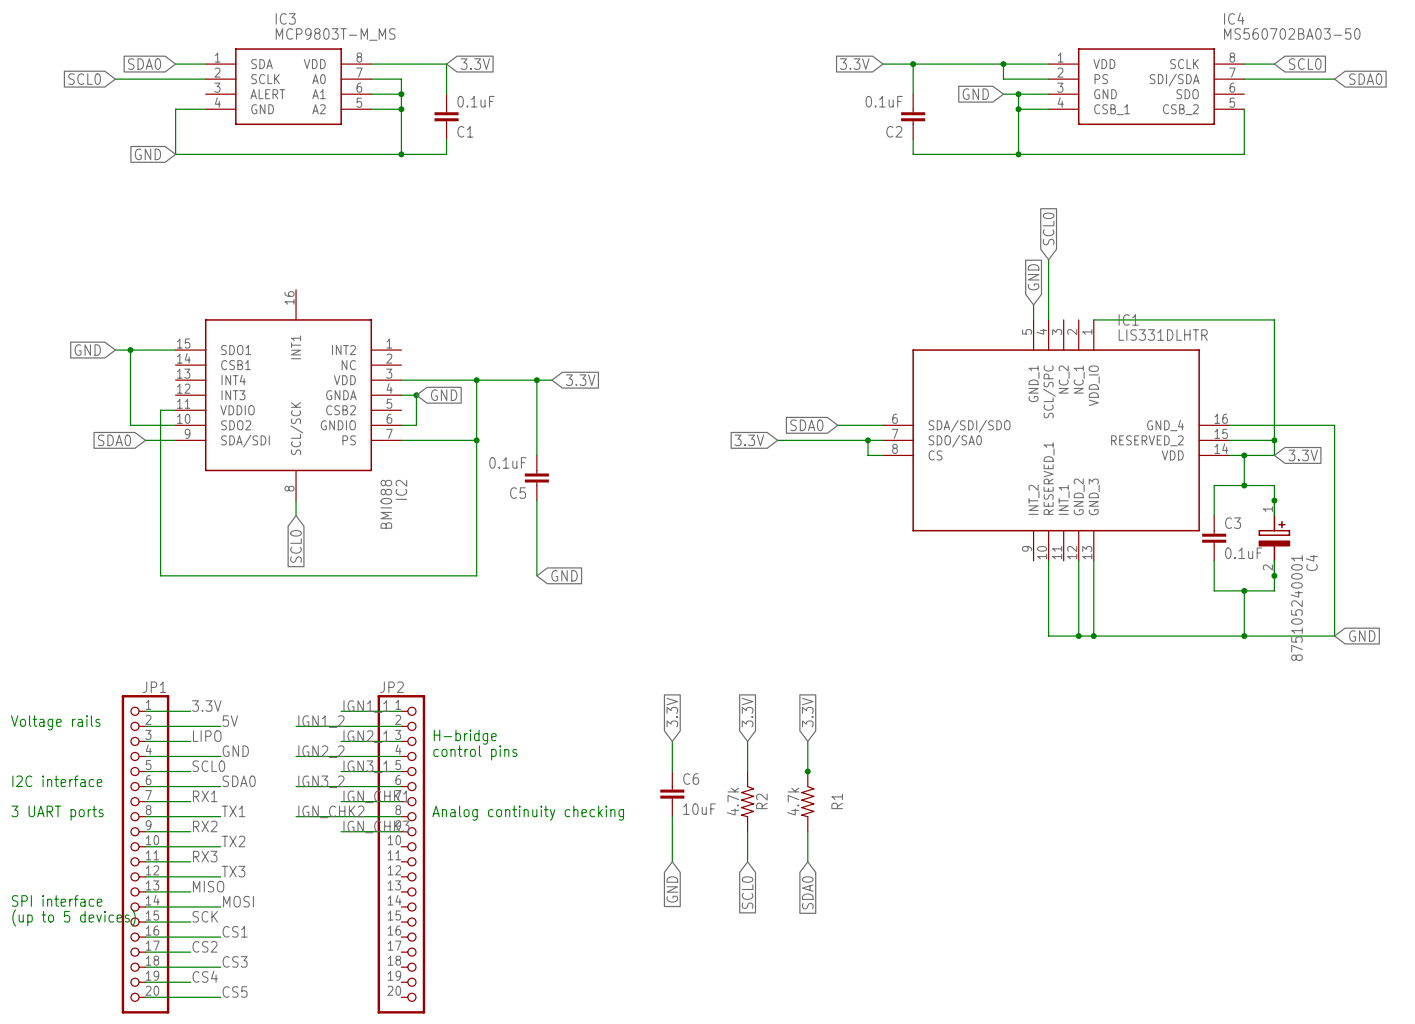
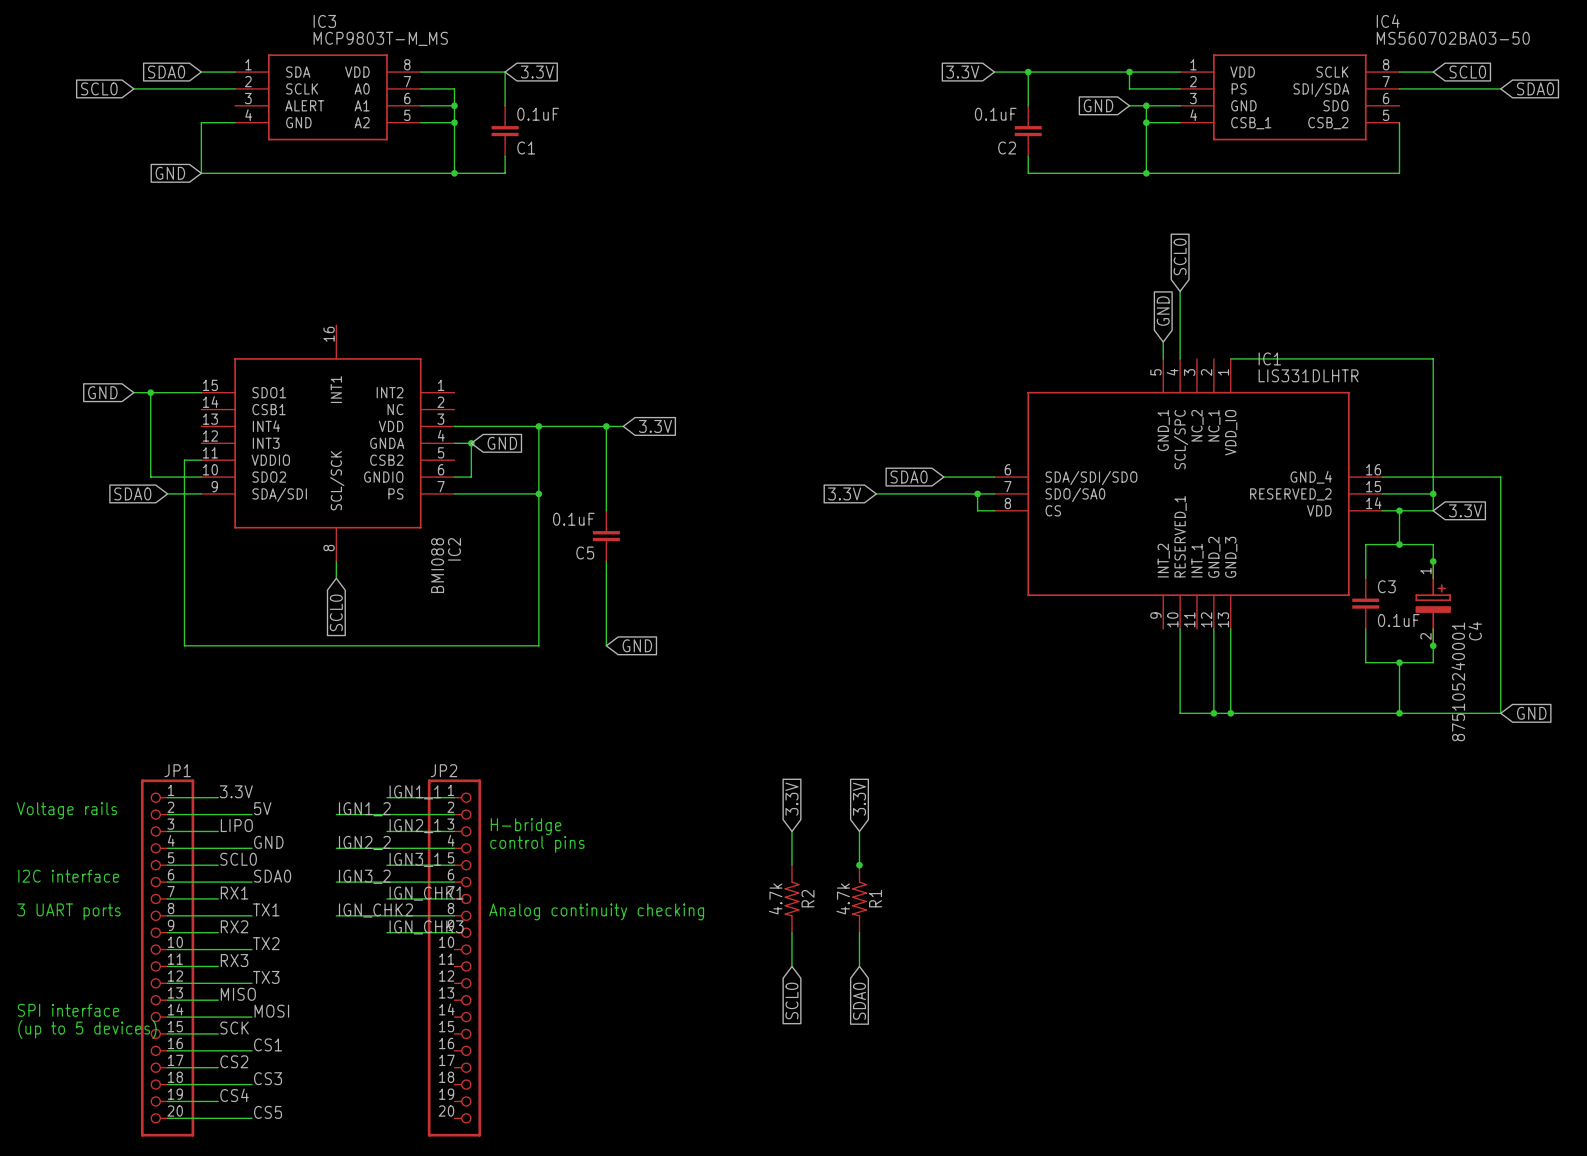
global label: 3.3V (672, 712) -> none
global label: none -> 3.3V (791, 799)
global label position: 3.3V (747, 712) -> 3.3V (859, 799)
global label: 3.3V (807, 712) -> none
wire: (672, 741) (672, 771) -> none
wire: (747, 741) (747, 771) -> (791, 831) (791, 865)
wire: (807, 741) (807, 771) -> (859, 831) (859, 865)
junction: none -> (859, 865)
junction: (807, 771) -> none
C6: 10uF (672, 794) -> none
R2 position: (747, 801) -> (791, 898)
R1 position: (807, 801) -> (859, 898)
R1 name position: R1 (837, 801) -> R1 (875, 898)
wire: (672, 816) (672, 861) -> none
wire: (747, 831) (747, 861) -> (791, 932) (791, 966)
wire: (807, 831) (807, 861) -> (859, 932) (859, 966)
global label: GND (672, 889) -> none
global label position: SCL0 (747, 892) -> SCL0 (791, 1000)
global label position: SDA0 (807, 892) -> SDA0 (859, 1001)

